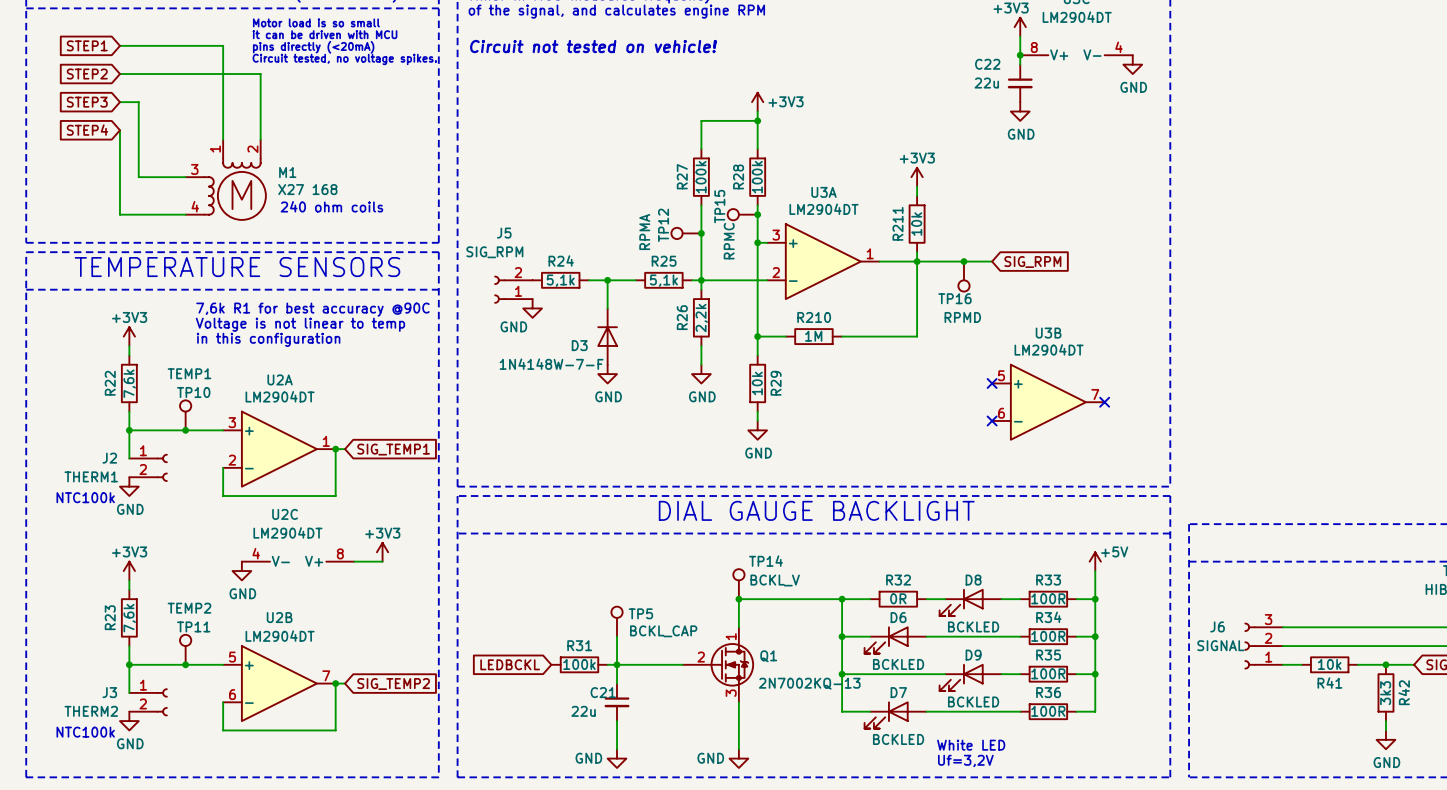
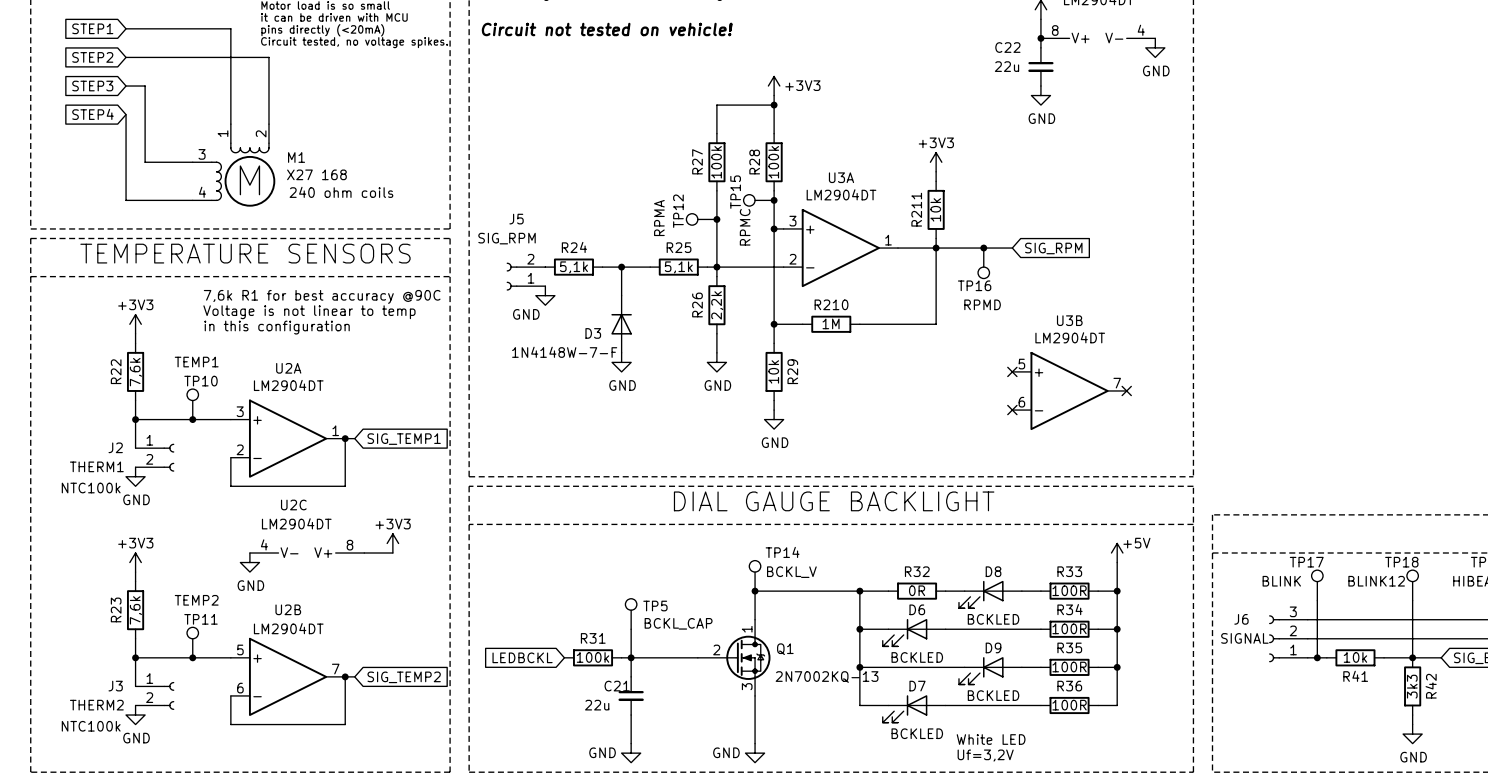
TP17: none -> BLINK (1317, 585)
TP18: none -> BLINK12 (1412, 585)
wire: none -> (1317, 600) (1317, 657)
wire: none -> (1412, 600) (1412, 657)
junction: none -> (1317, 657)

